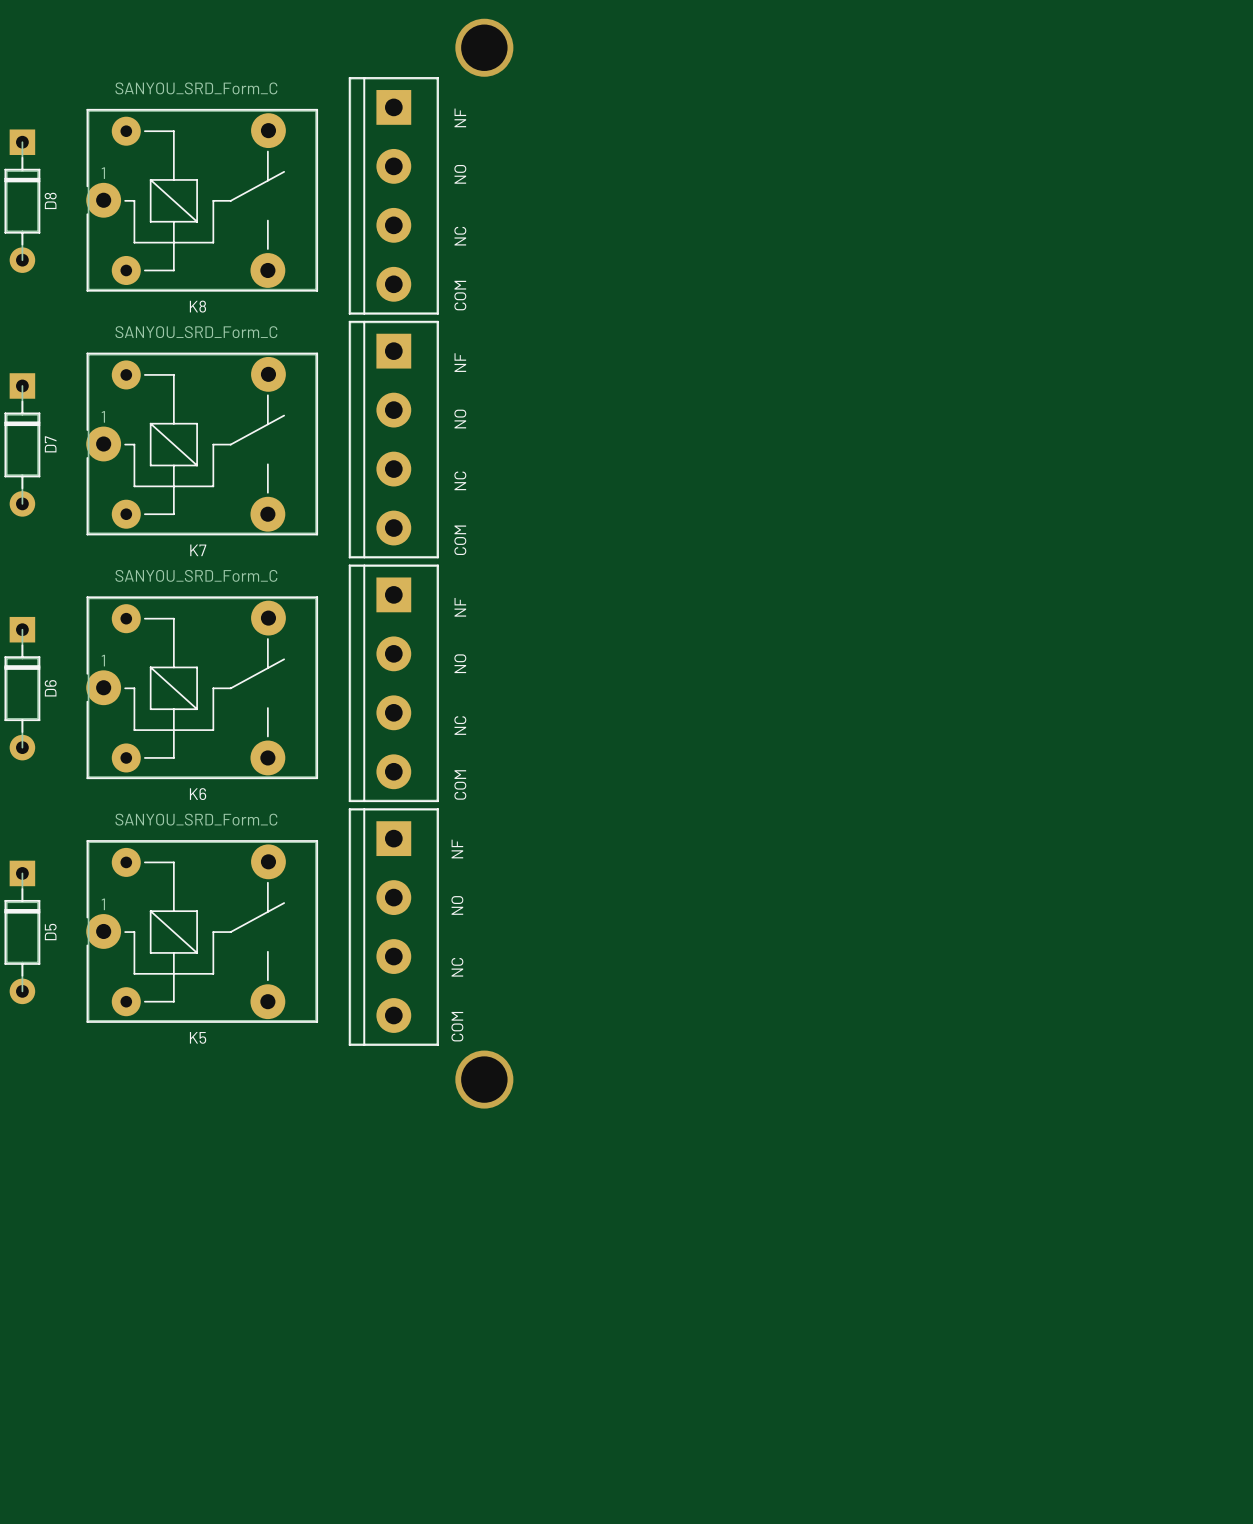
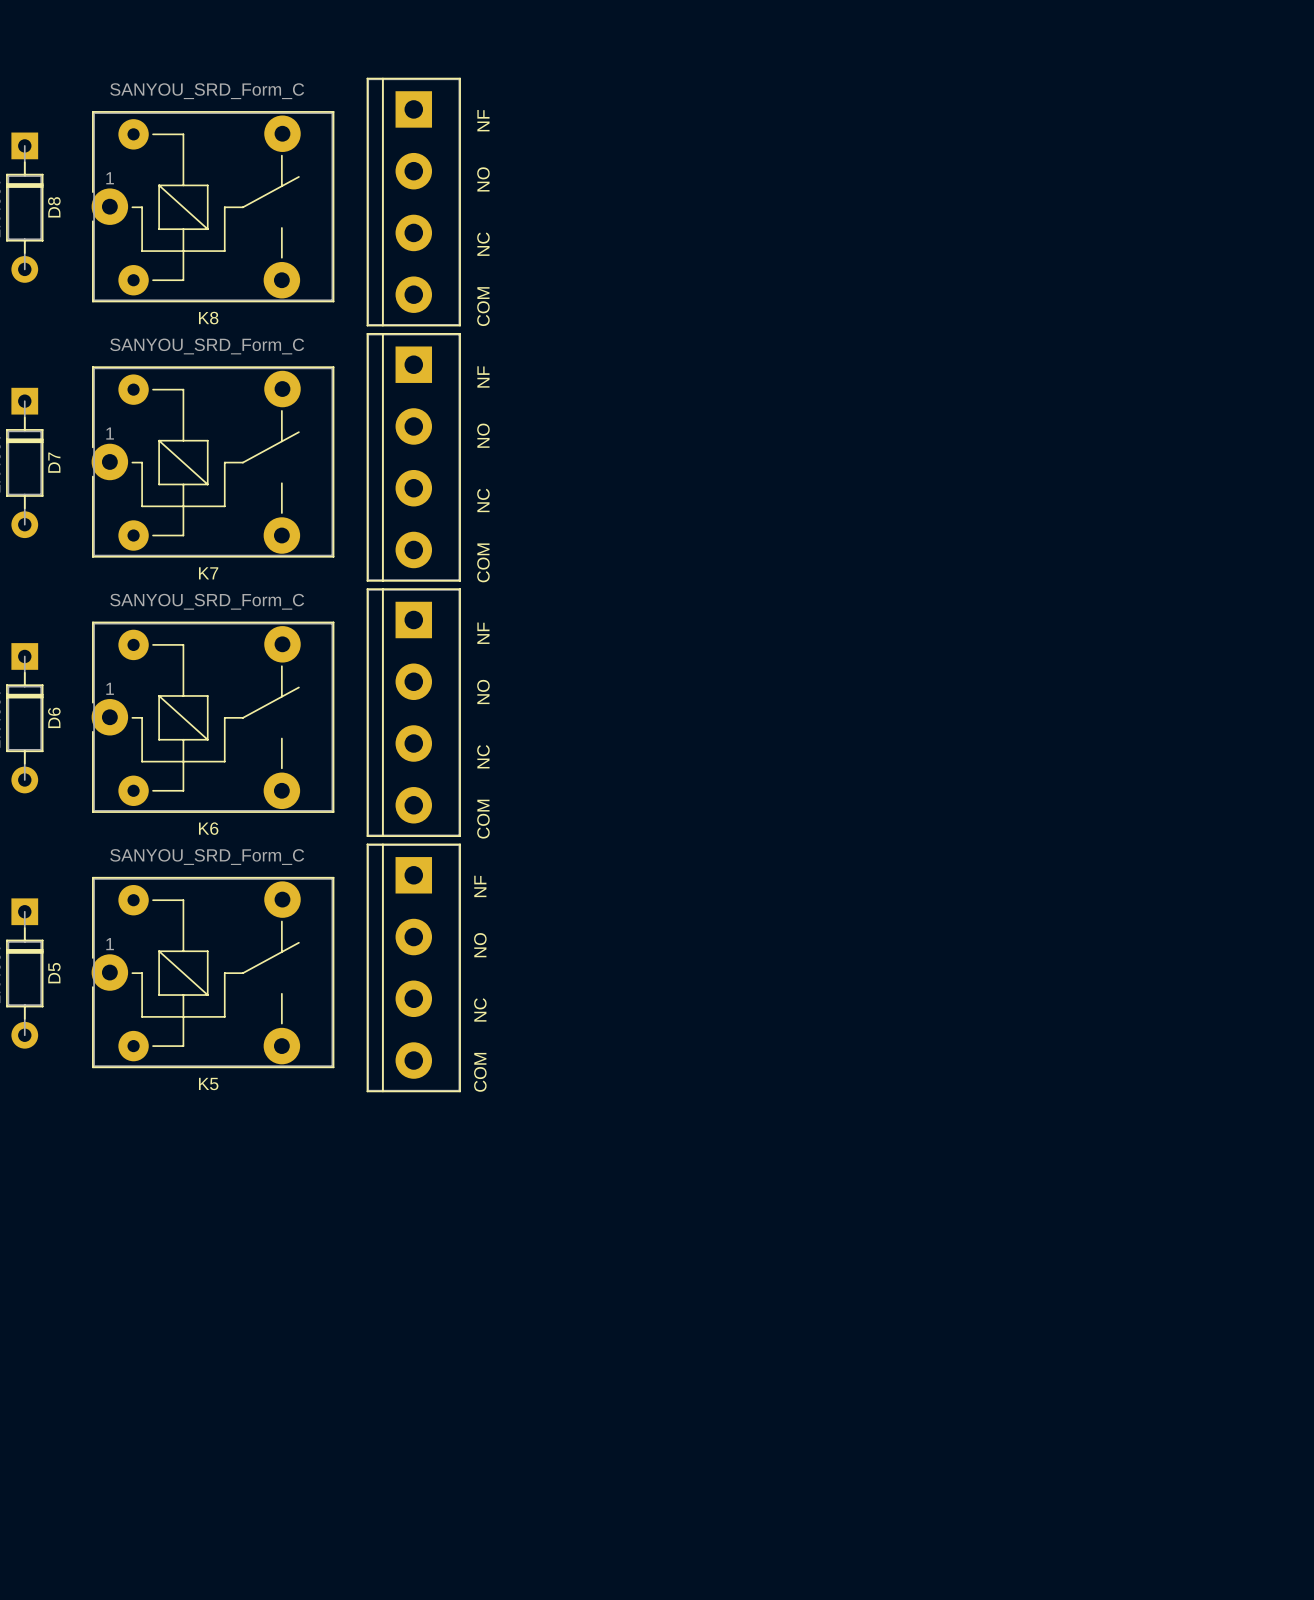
via: (484, 47) -> none
via: (484, 1079) -> none

